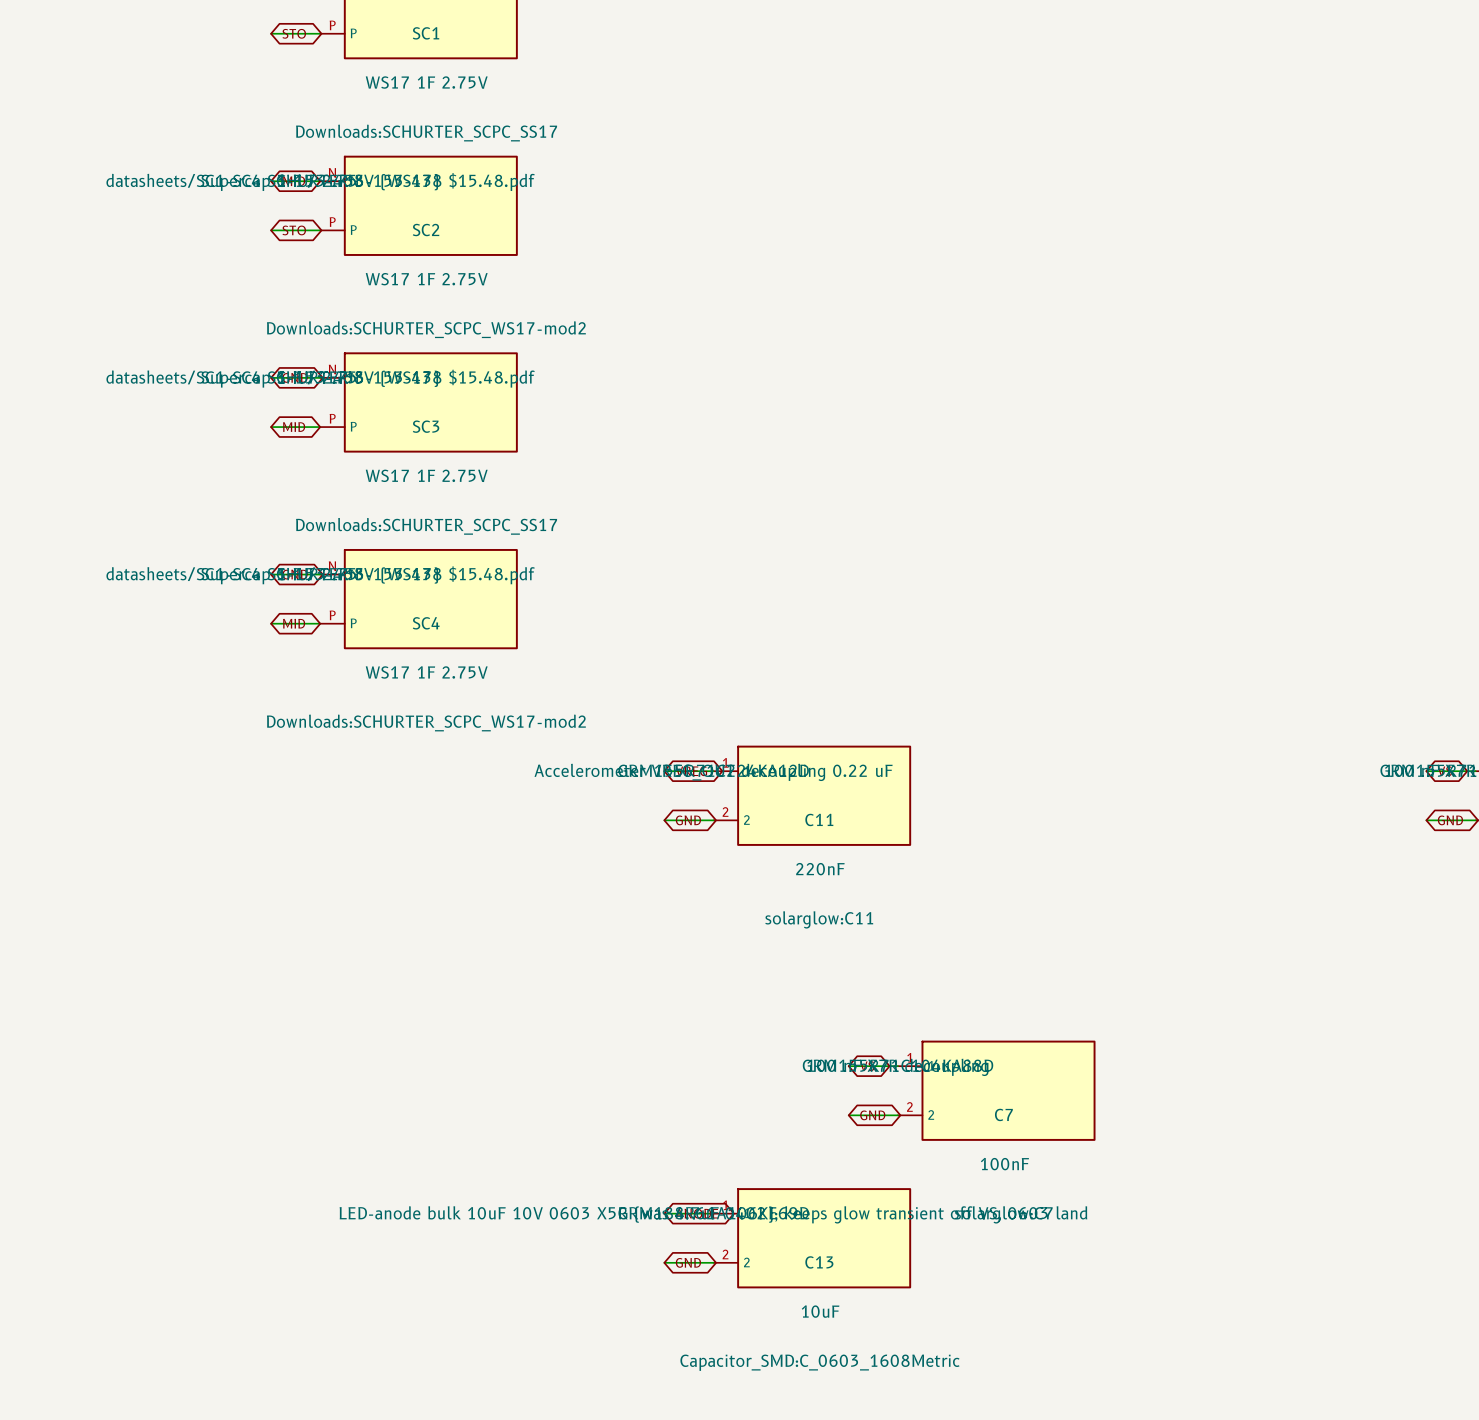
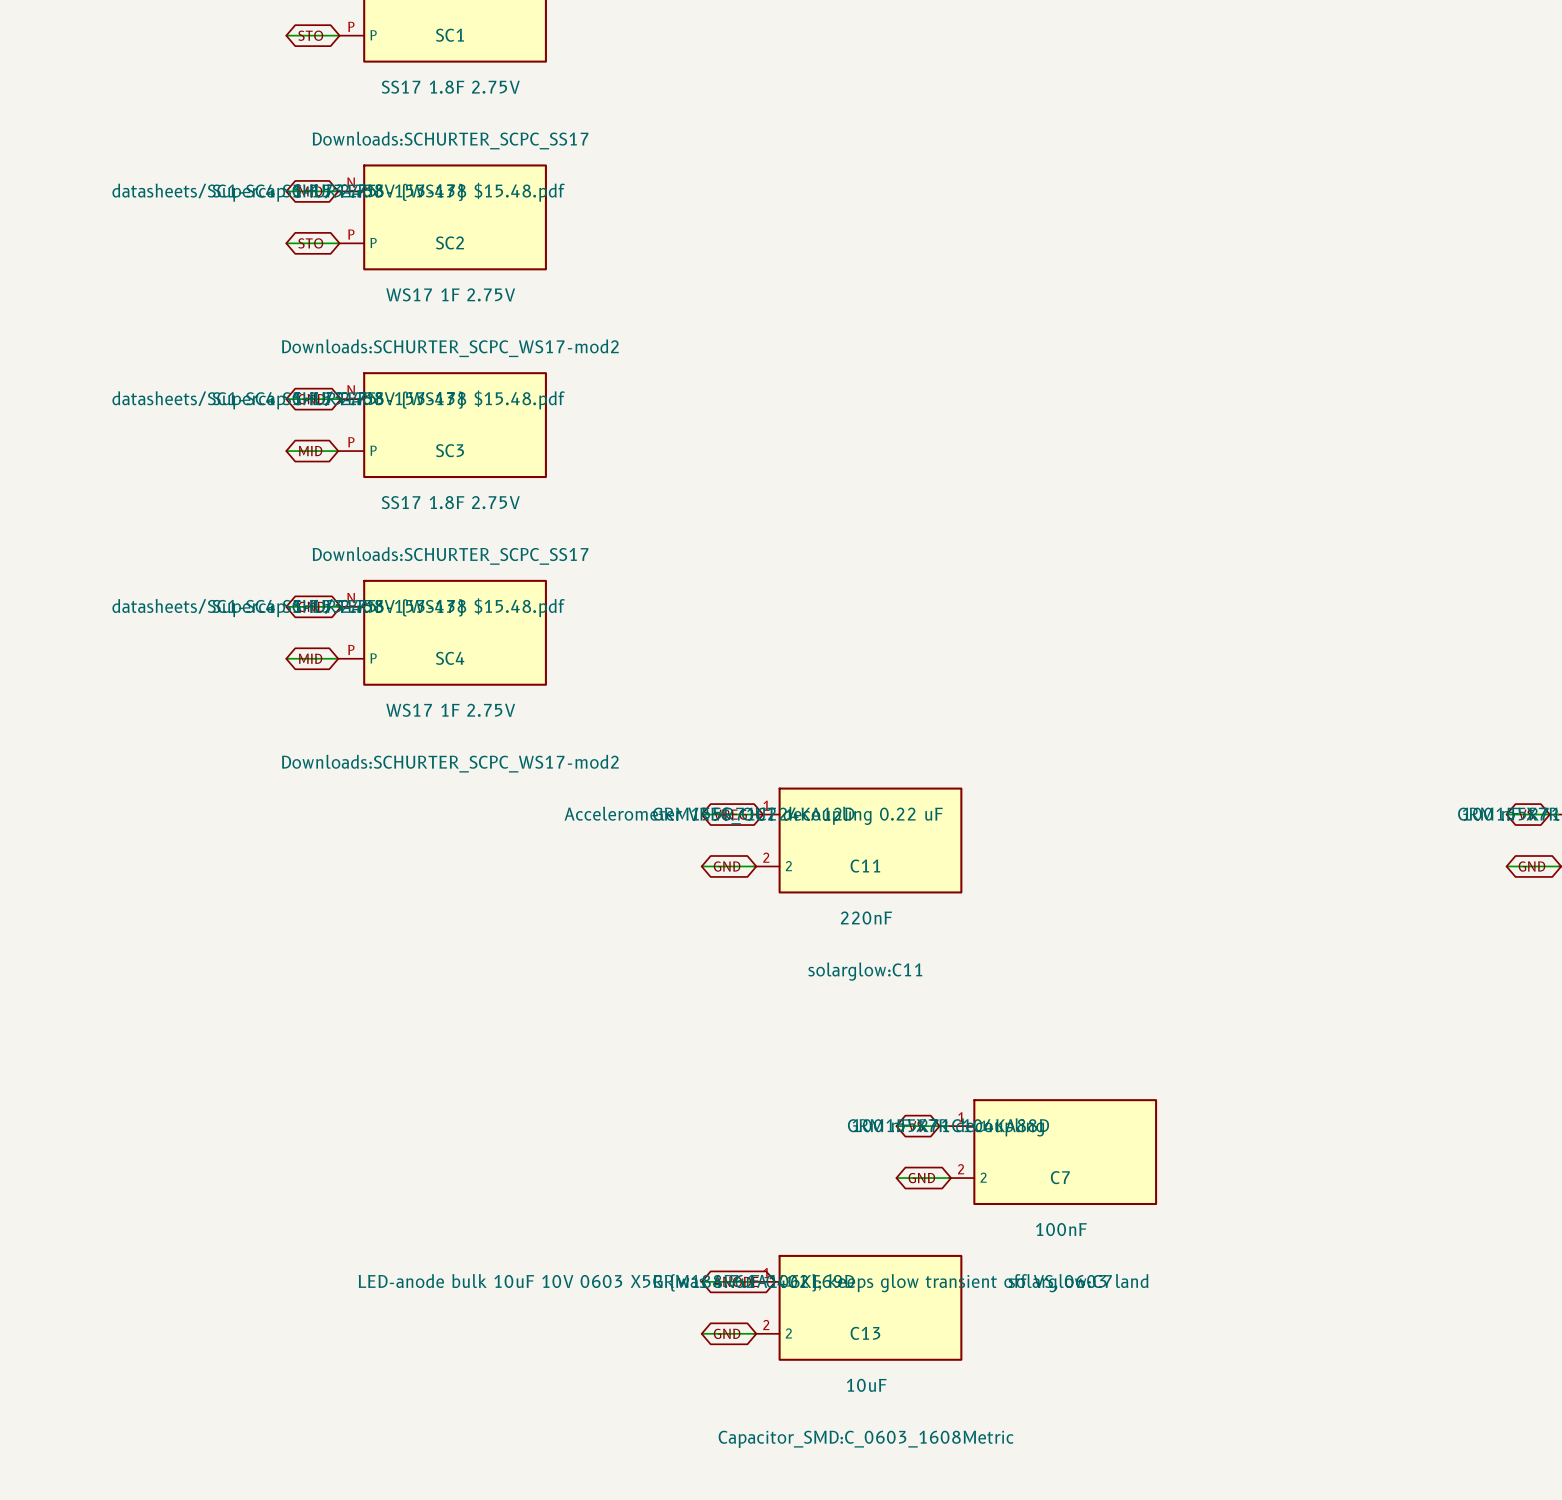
SC1 value: WS17 1F 2.75V (426, 82) -> SS17 1.8F 2.75V (450, 87)
SC3 value: WS17 1F 2.75V (426, 475) -> SS17 1.8F 2.75V (450, 502)

